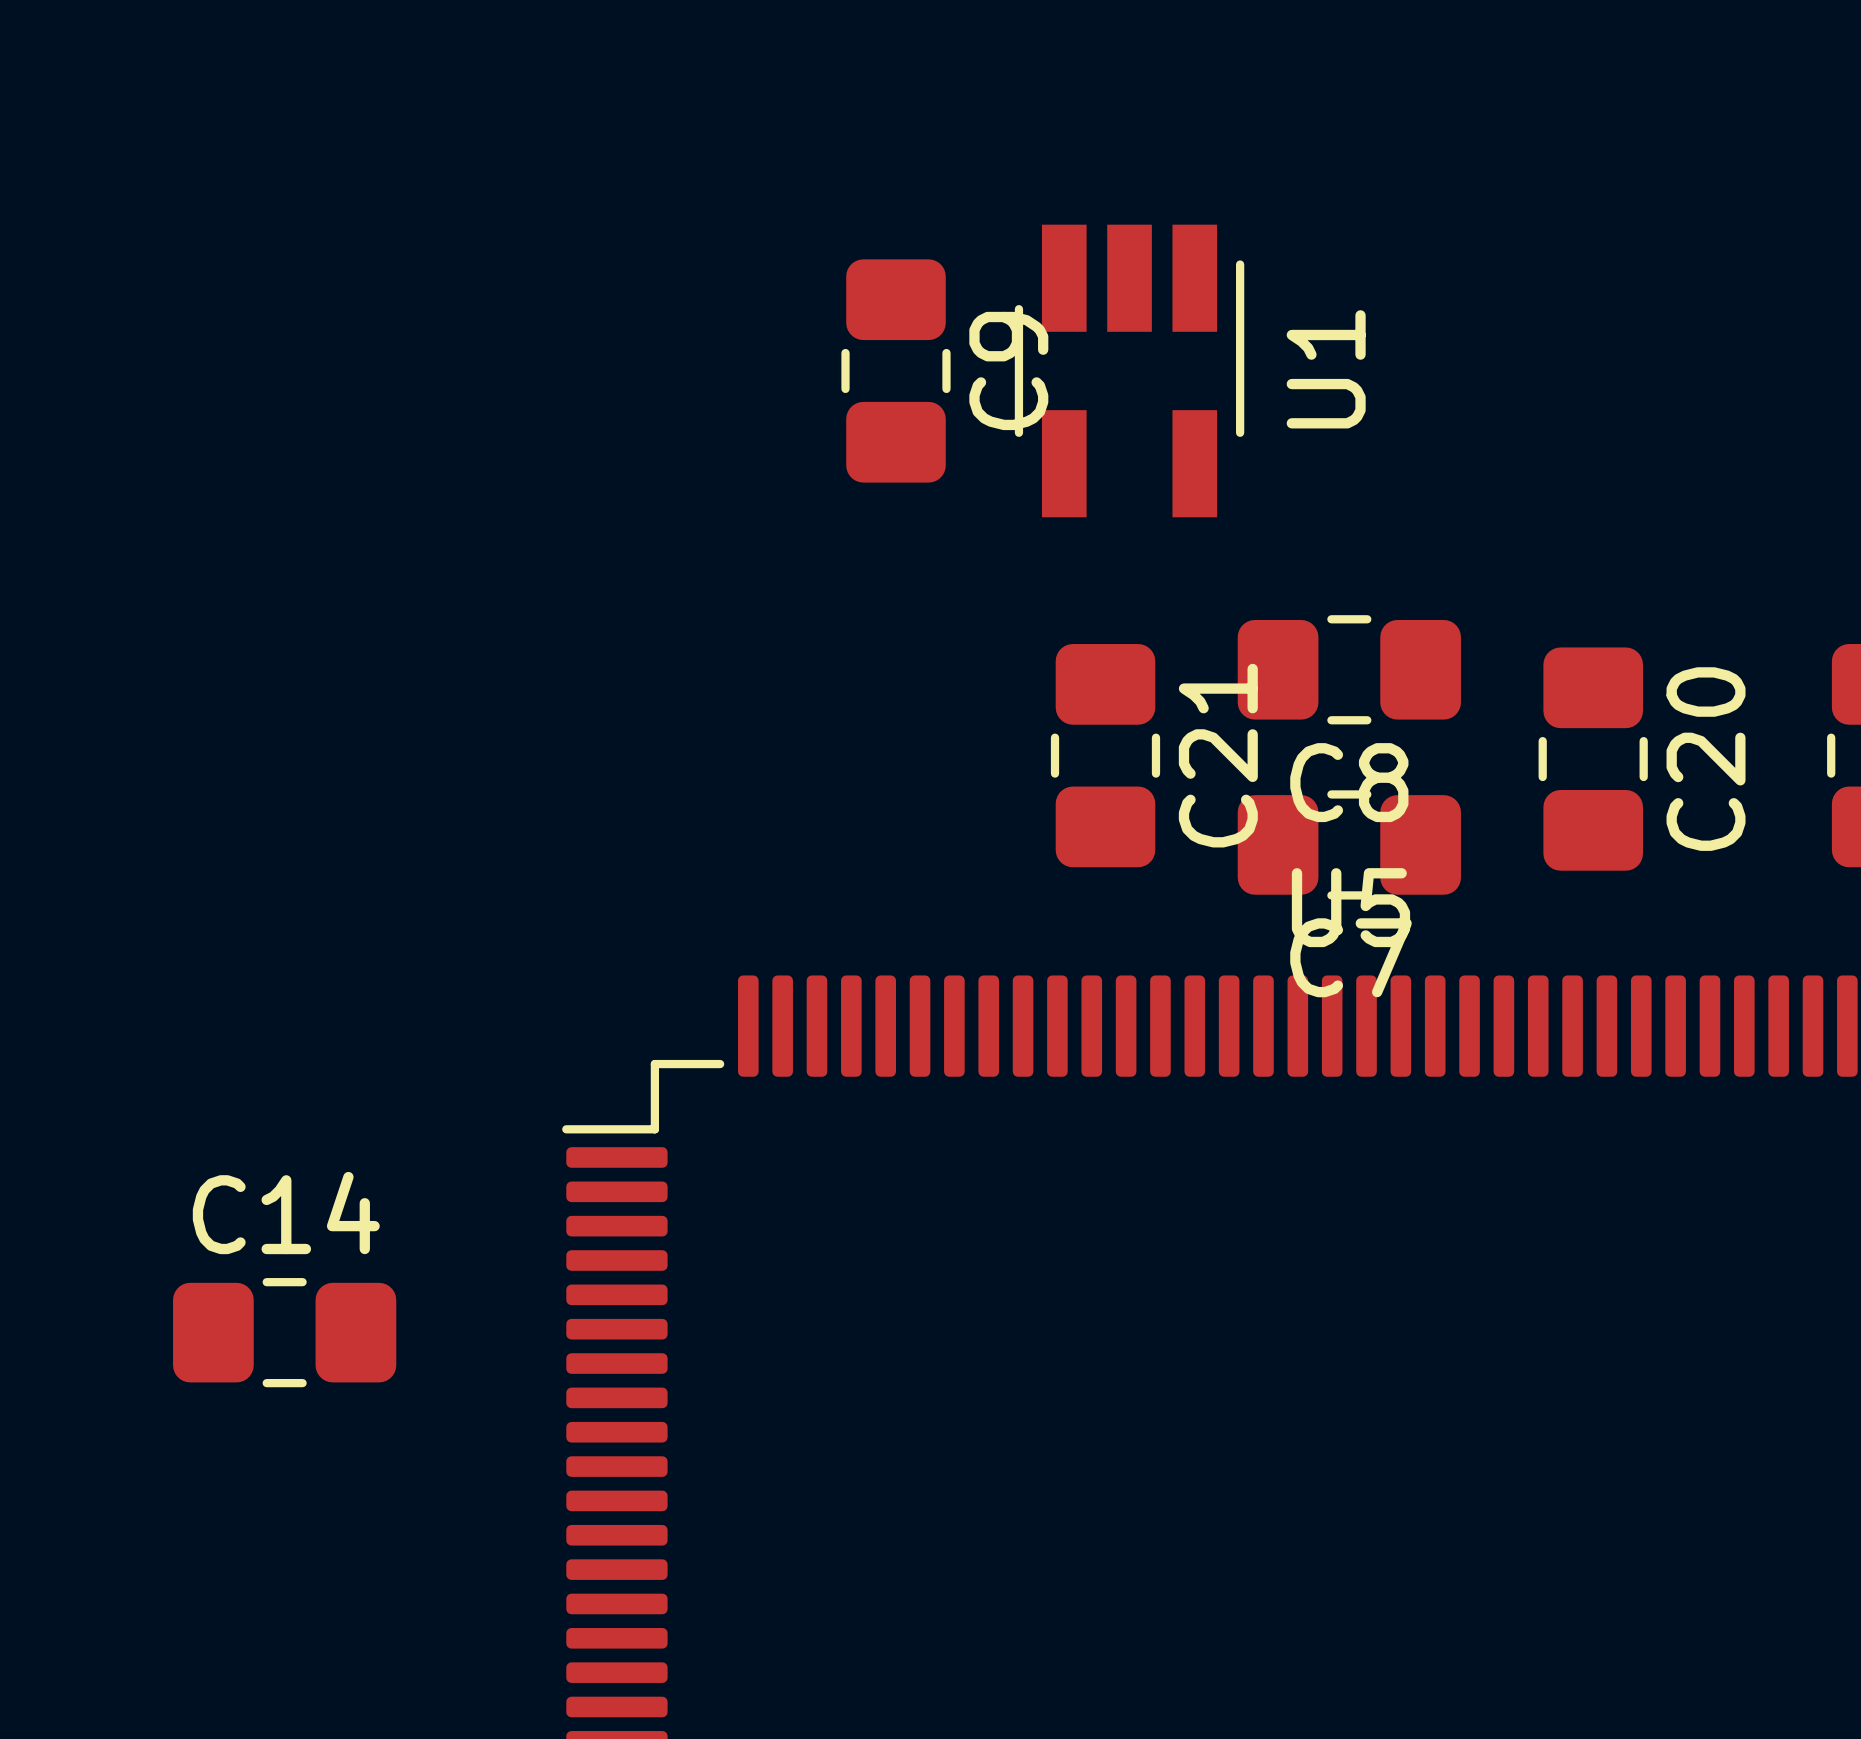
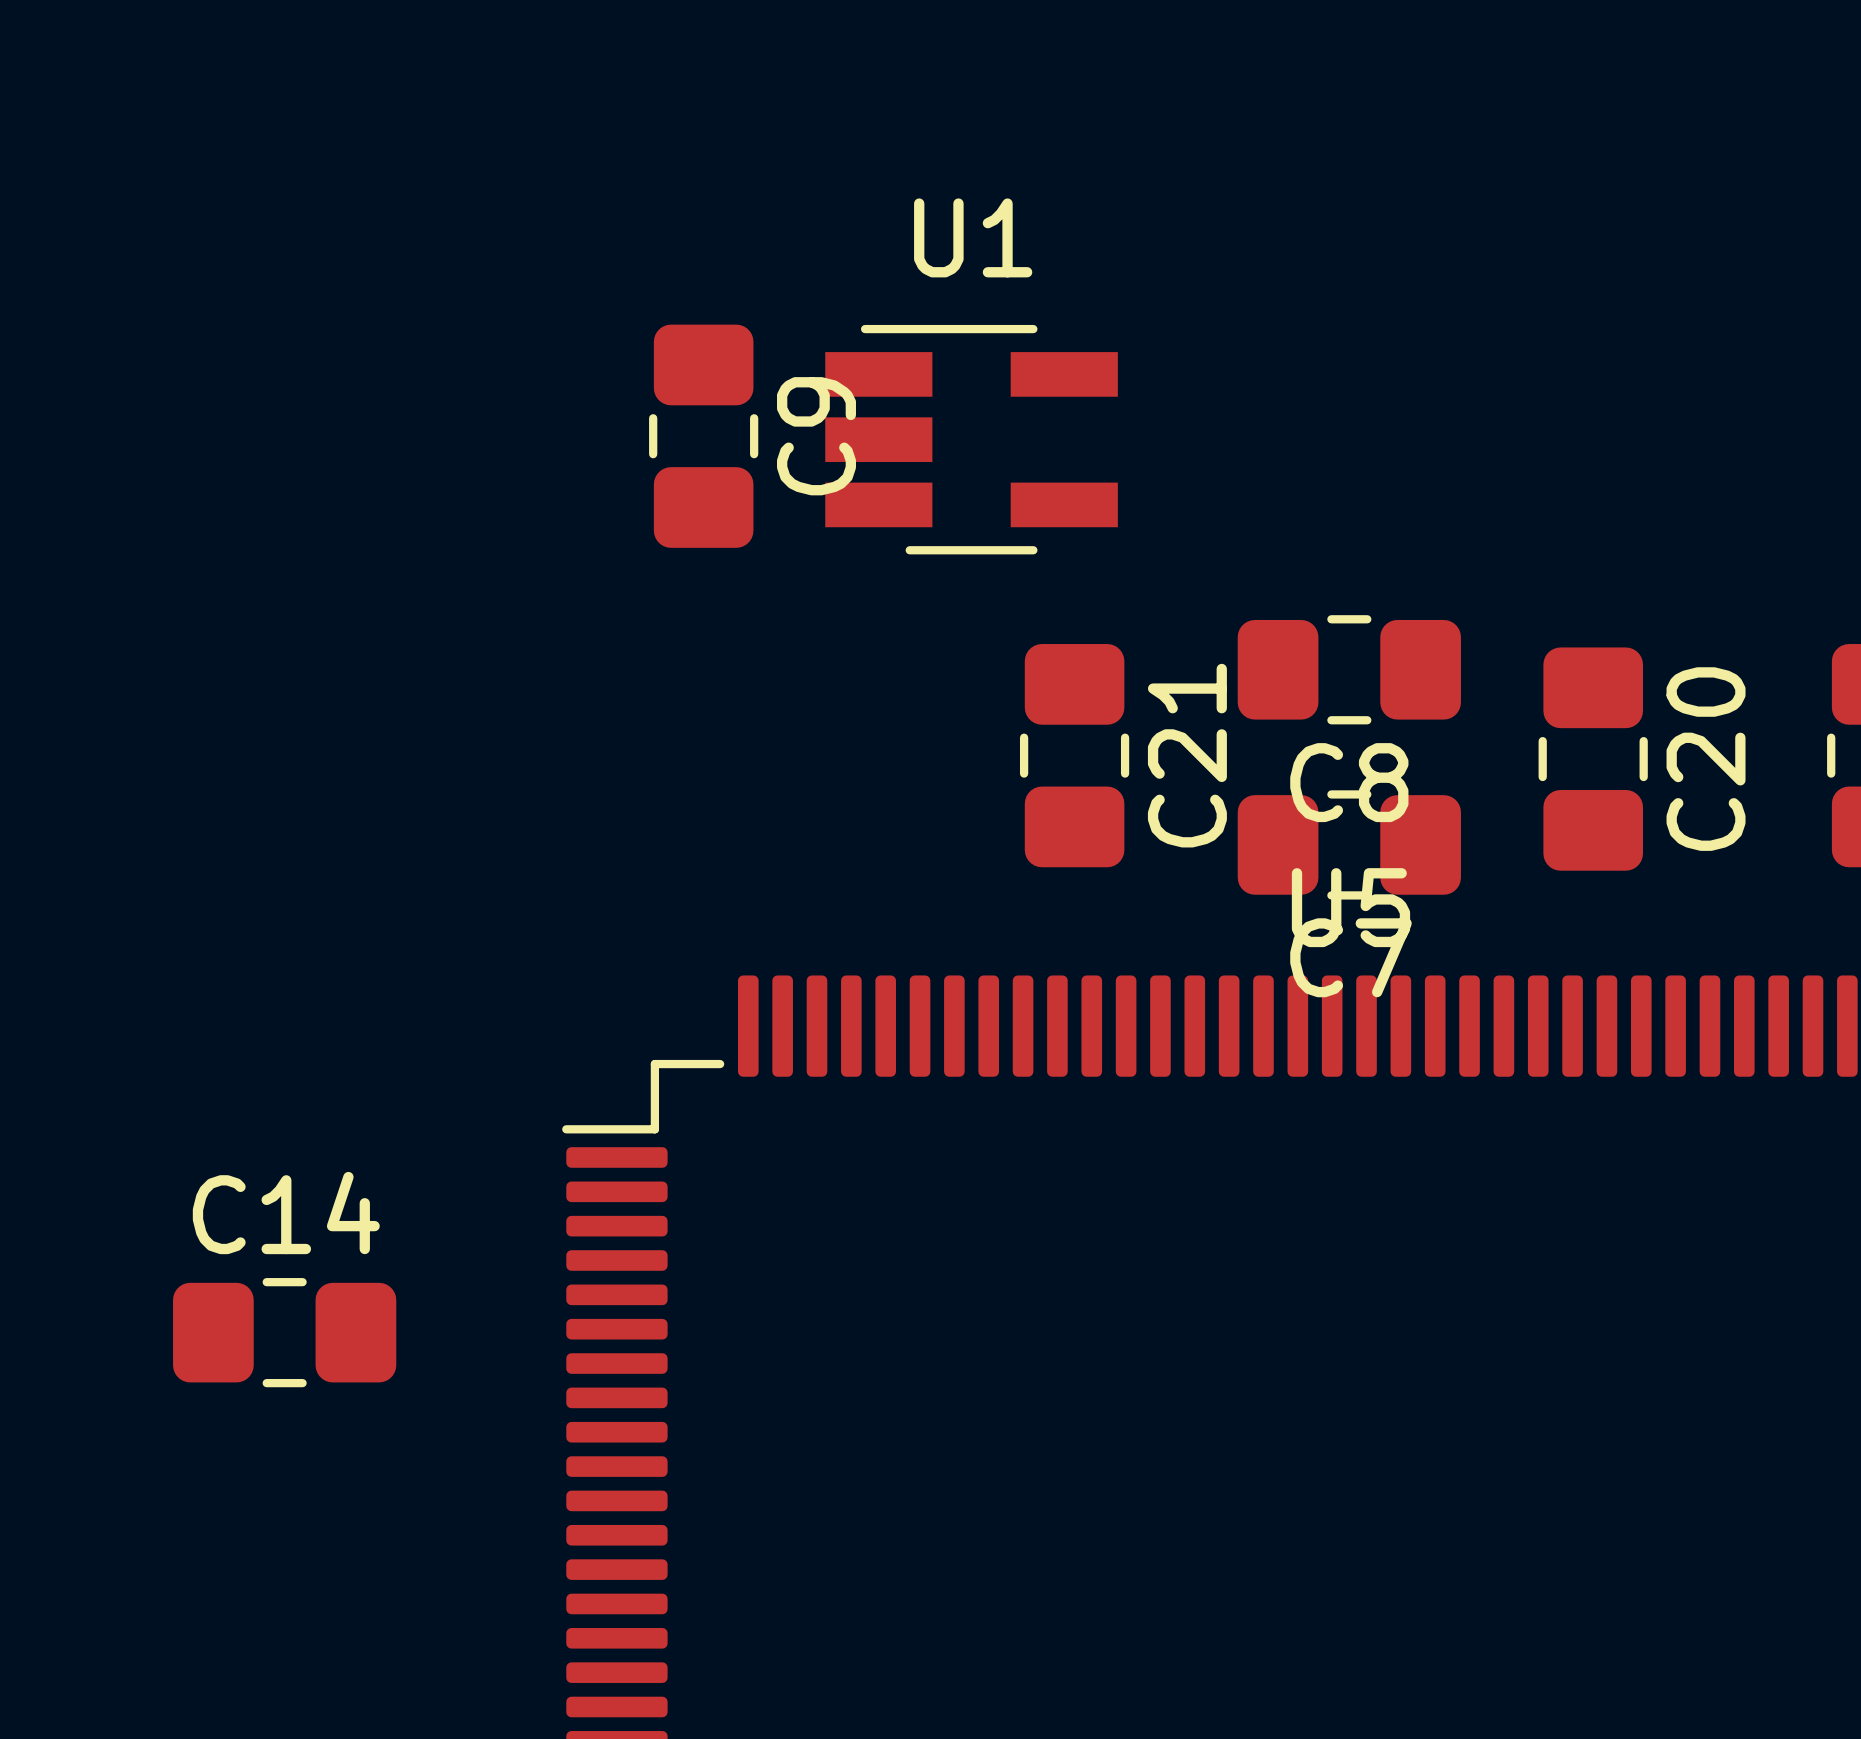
C9 position: (895, 370) -> (703, 436)
U1 rotation: 0° (1129, 370) -> 90° counterclockwise (971, 439)
C21 position: (1105, 755) -> (1074, 755)

